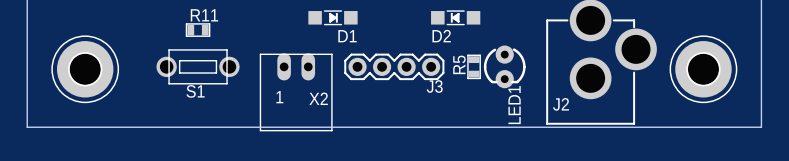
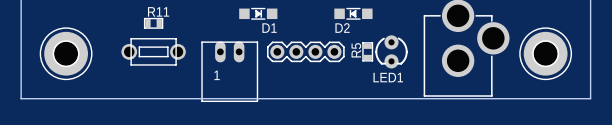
J3 name: J3 (434, 86) -> none
S1 name: S1 (195, 91) -> none
X2 name: X2 (318, 98) -> none
J2 name: J2 (561, 104) -> none
LED1 name rotation: 0° (514, 105) -> 90° clockwise (388, 77)

